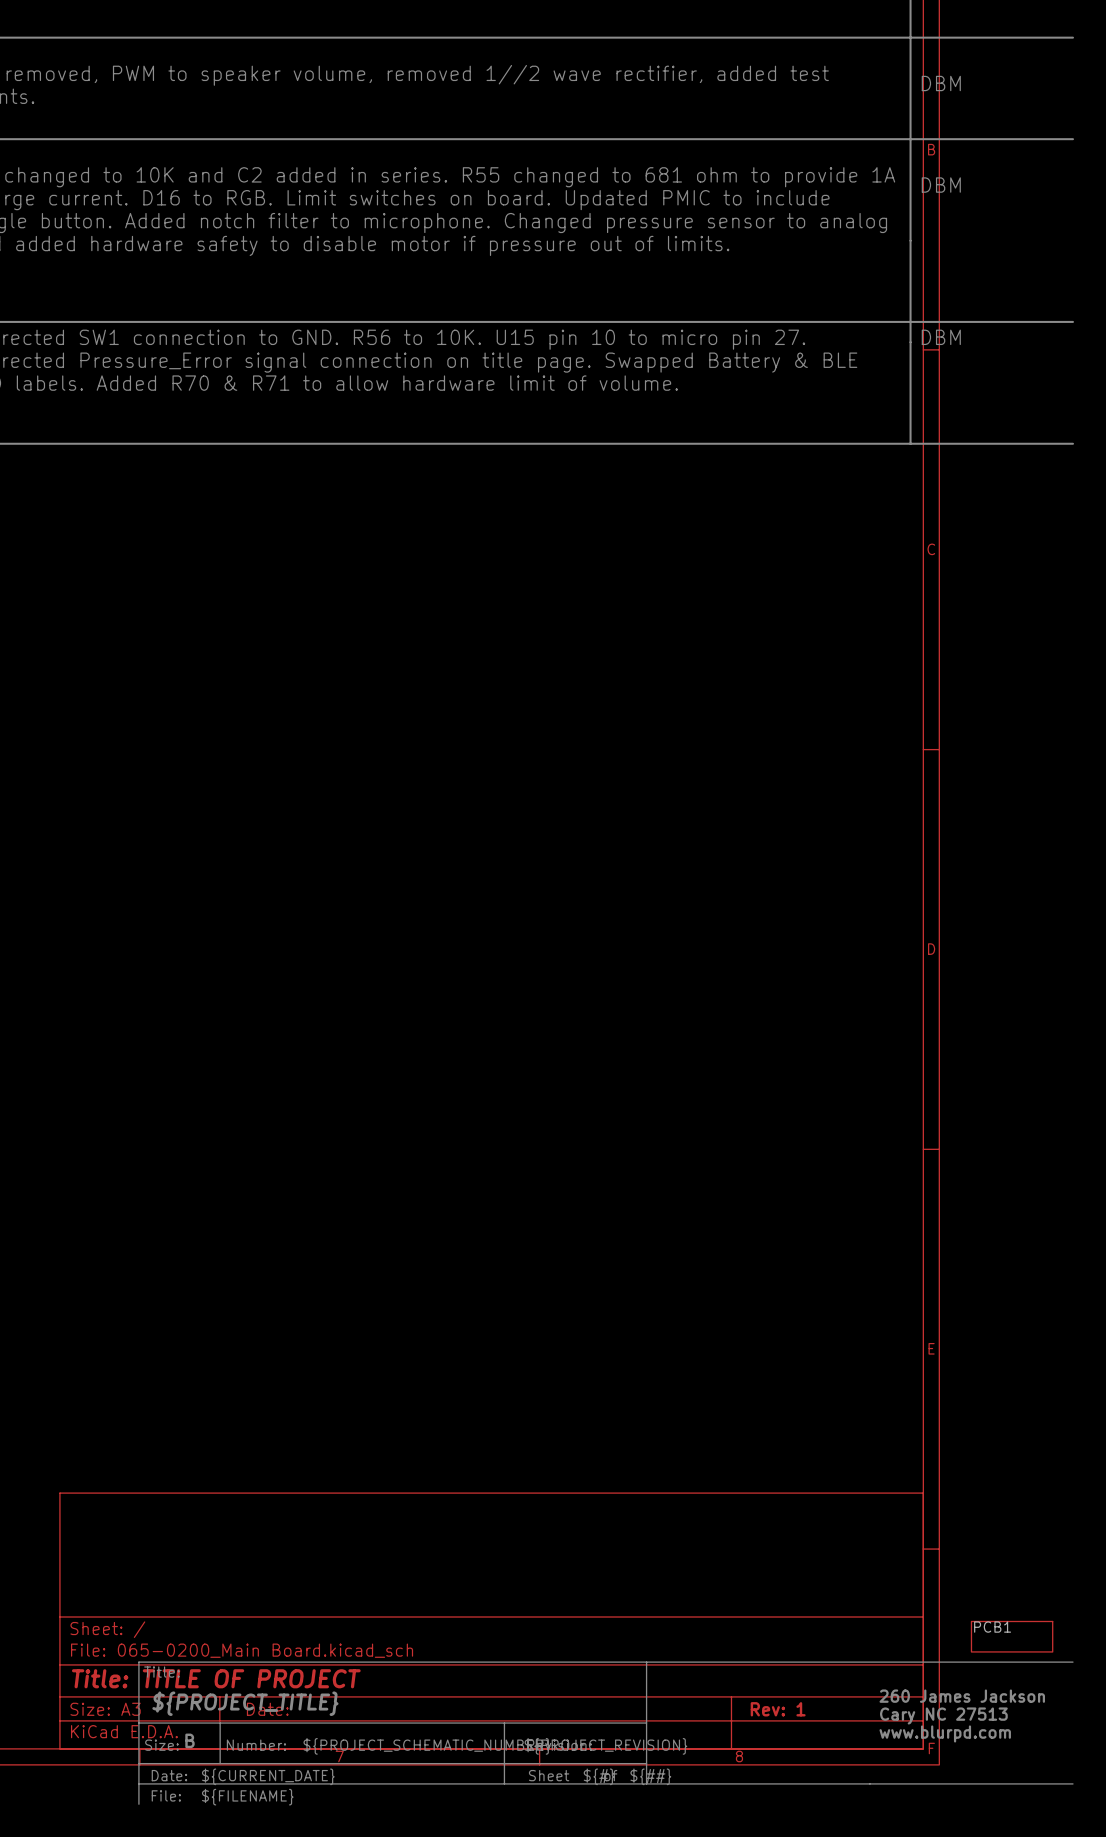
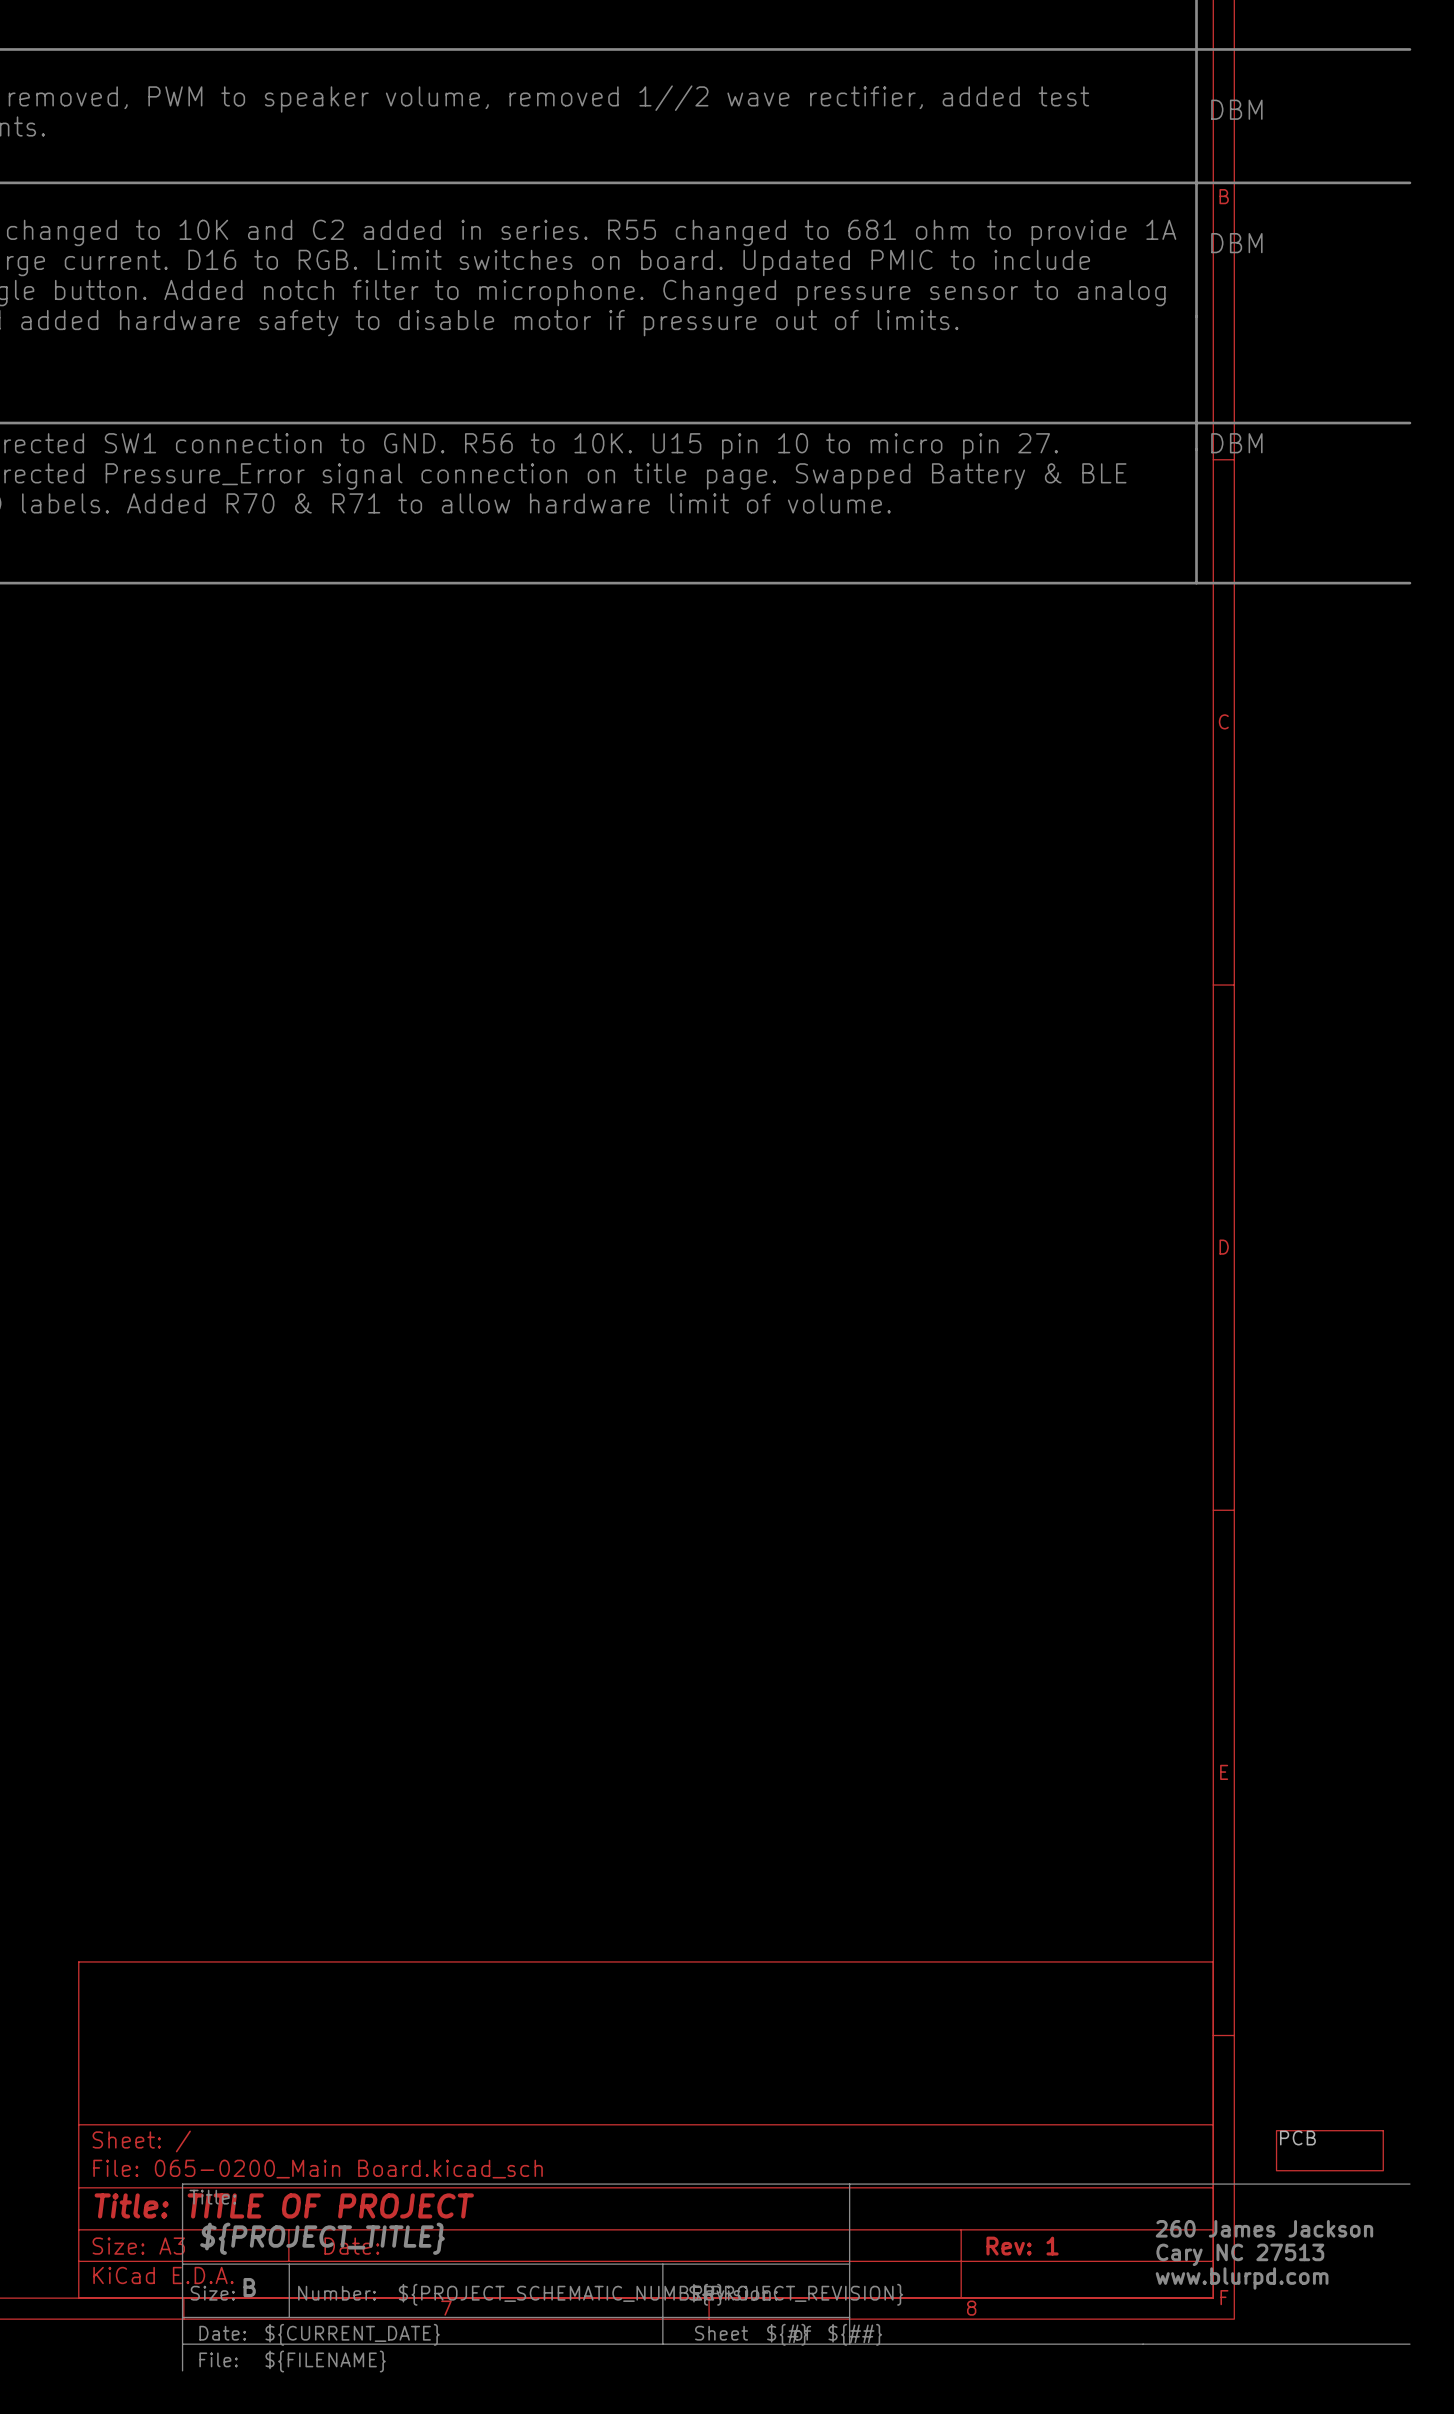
PCB1 name: PCB1 (992, 1627) -> PCB (1297, 2138)

